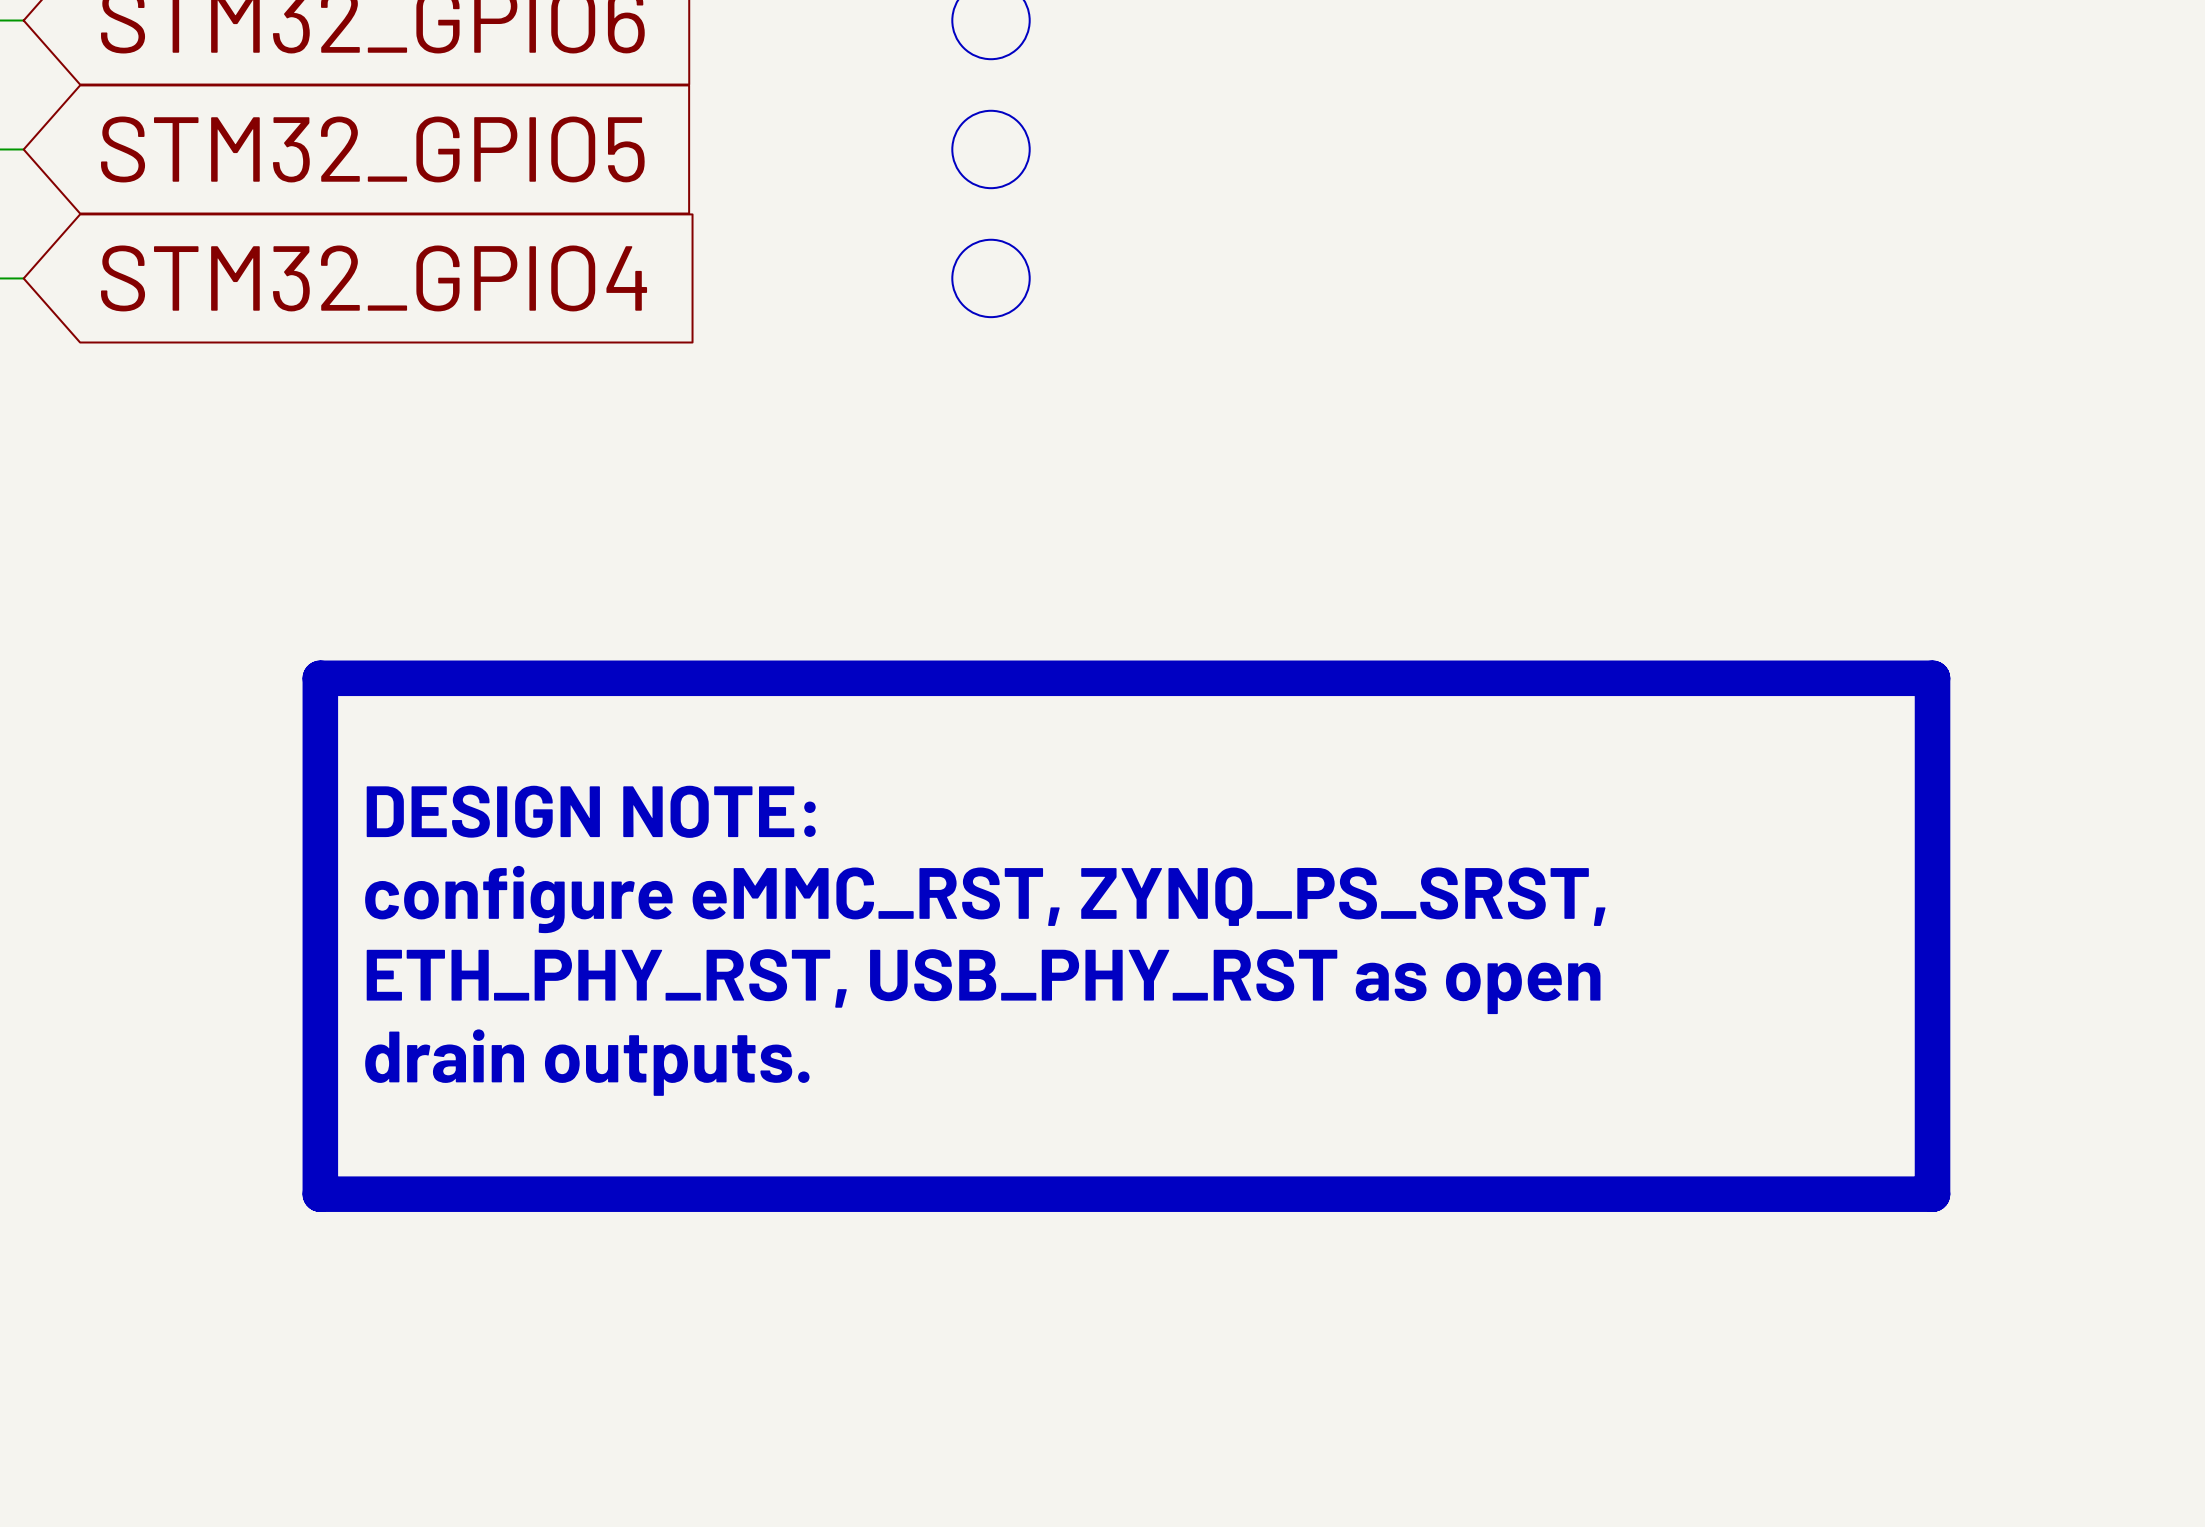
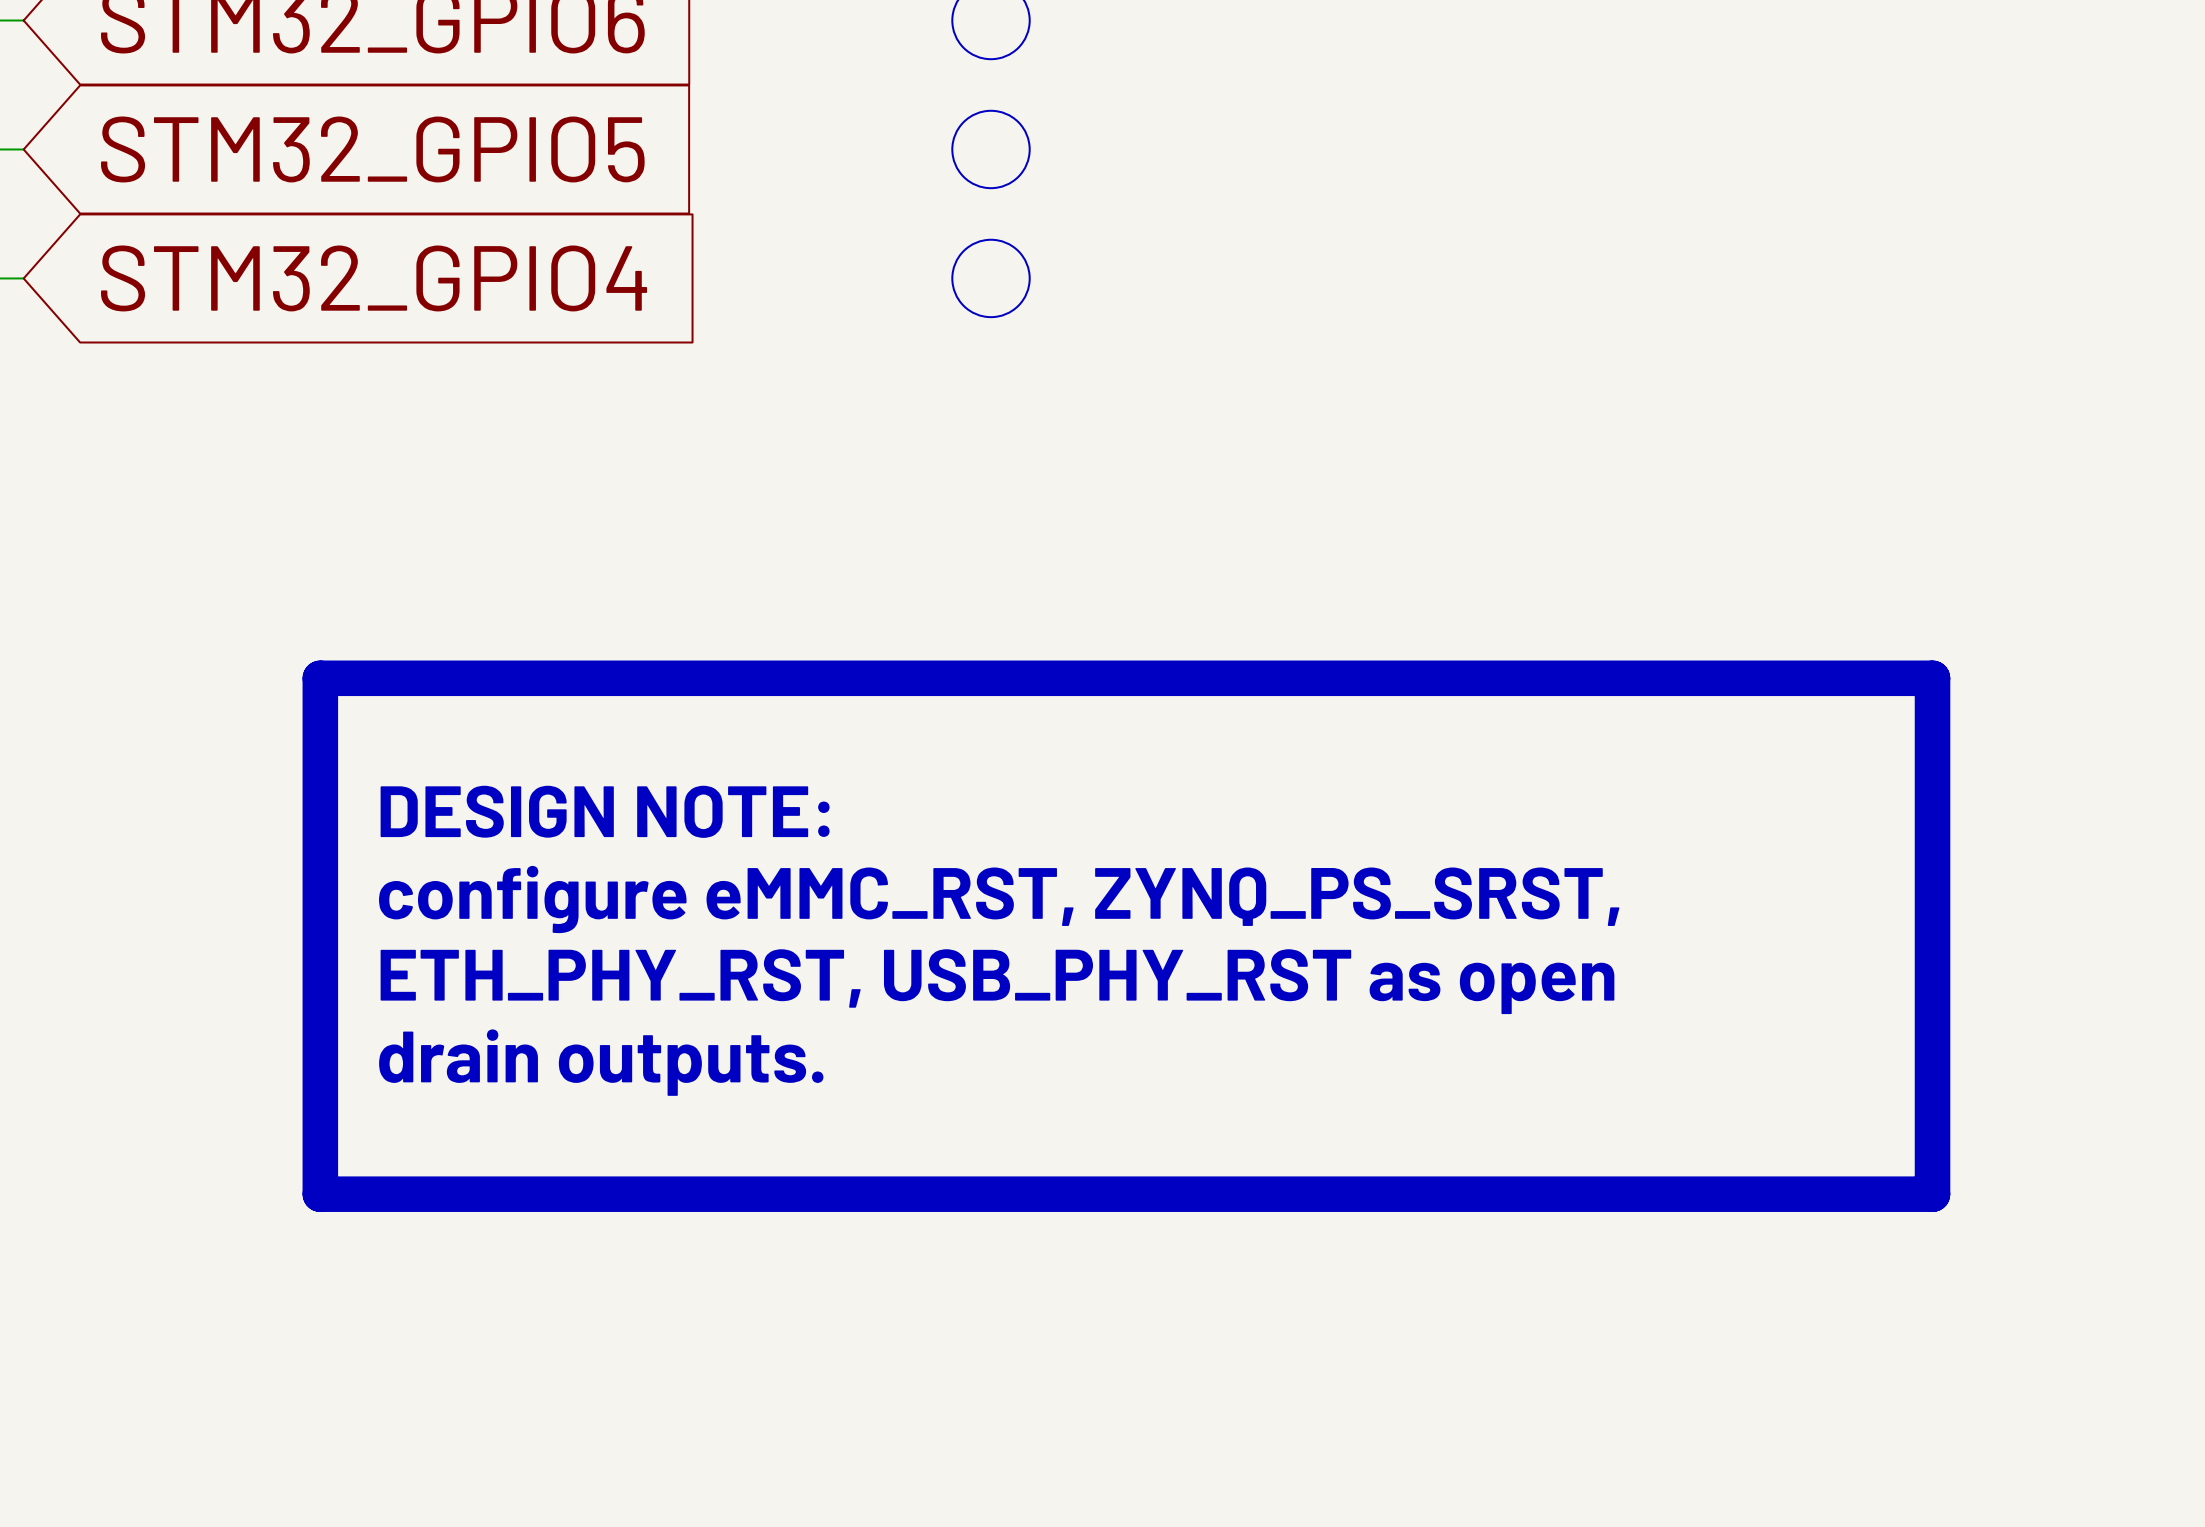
text position: DESIGN NOTE: (591, 811) -> DESIGN NOTE: (605, 811)
text position: configure eMMC_RST, ZYNQ_PS_SRST, (985, 899) -> configure eMMC_RST, ZYNQ_PS_SRST, (999, 899)
text position: ETH_PHY_RST, USB_PHY_RST as open (983, 981) -> ETH_PHY_RST, USB_PHY_RST as open (997, 981)
text position: drain outputs. (587, 1062) -> drain outputs. (601, 1062)

